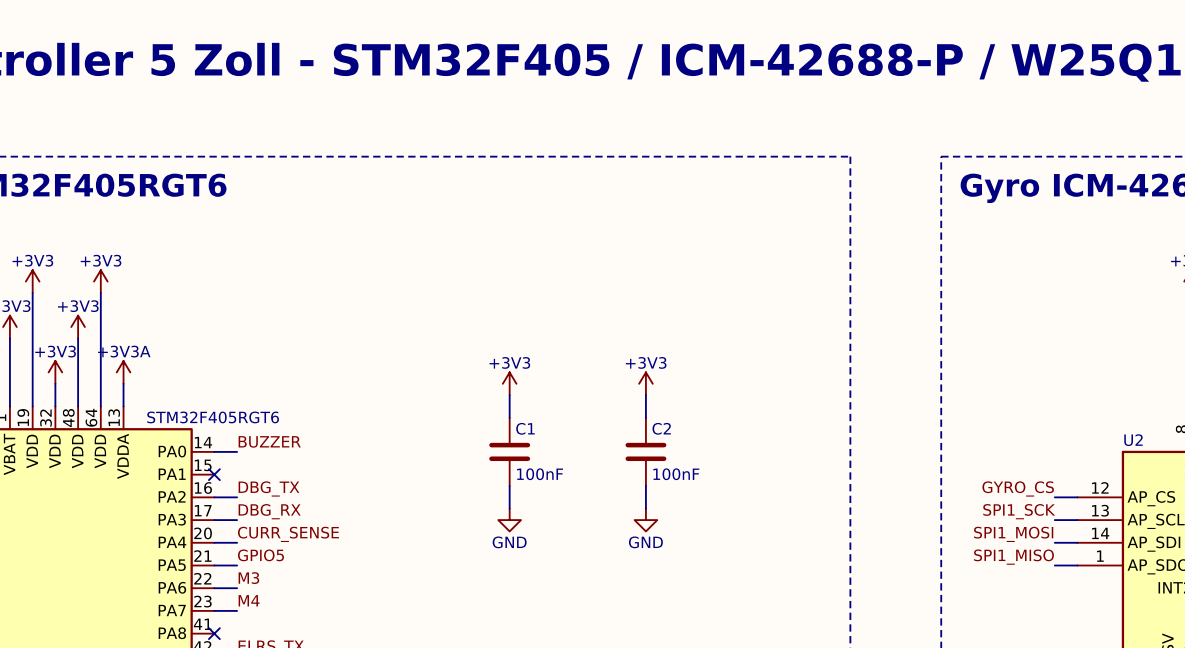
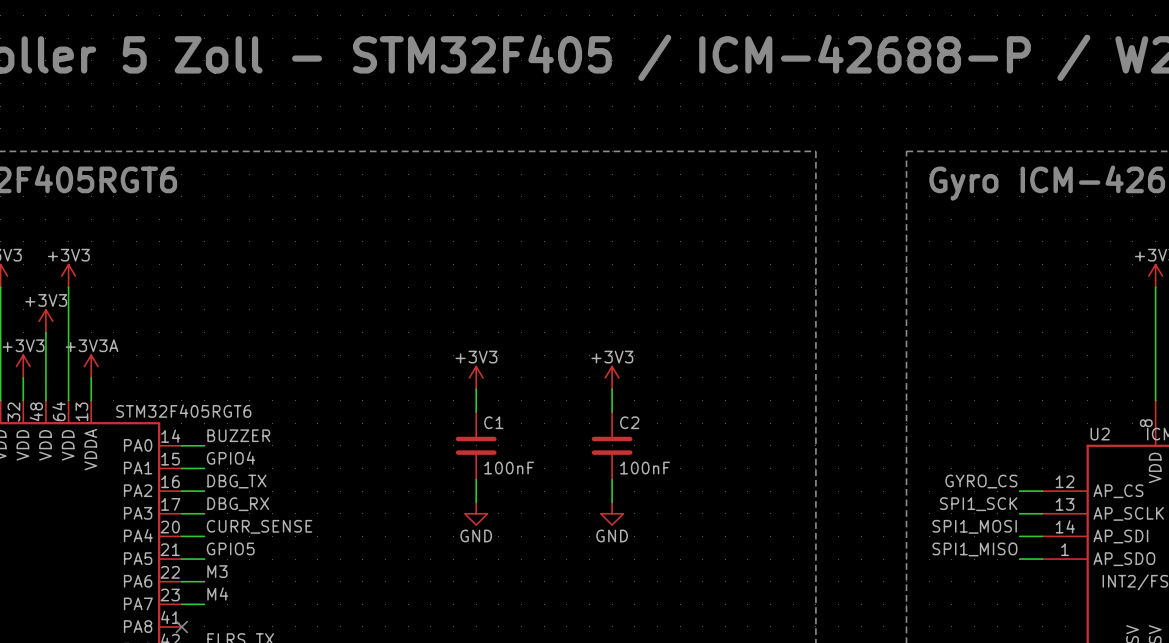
label: none -> GPIO4 (230, 458)
wire: none -> (181, 468) (204, 468)
no-connect mark: (214, 474) -> none

